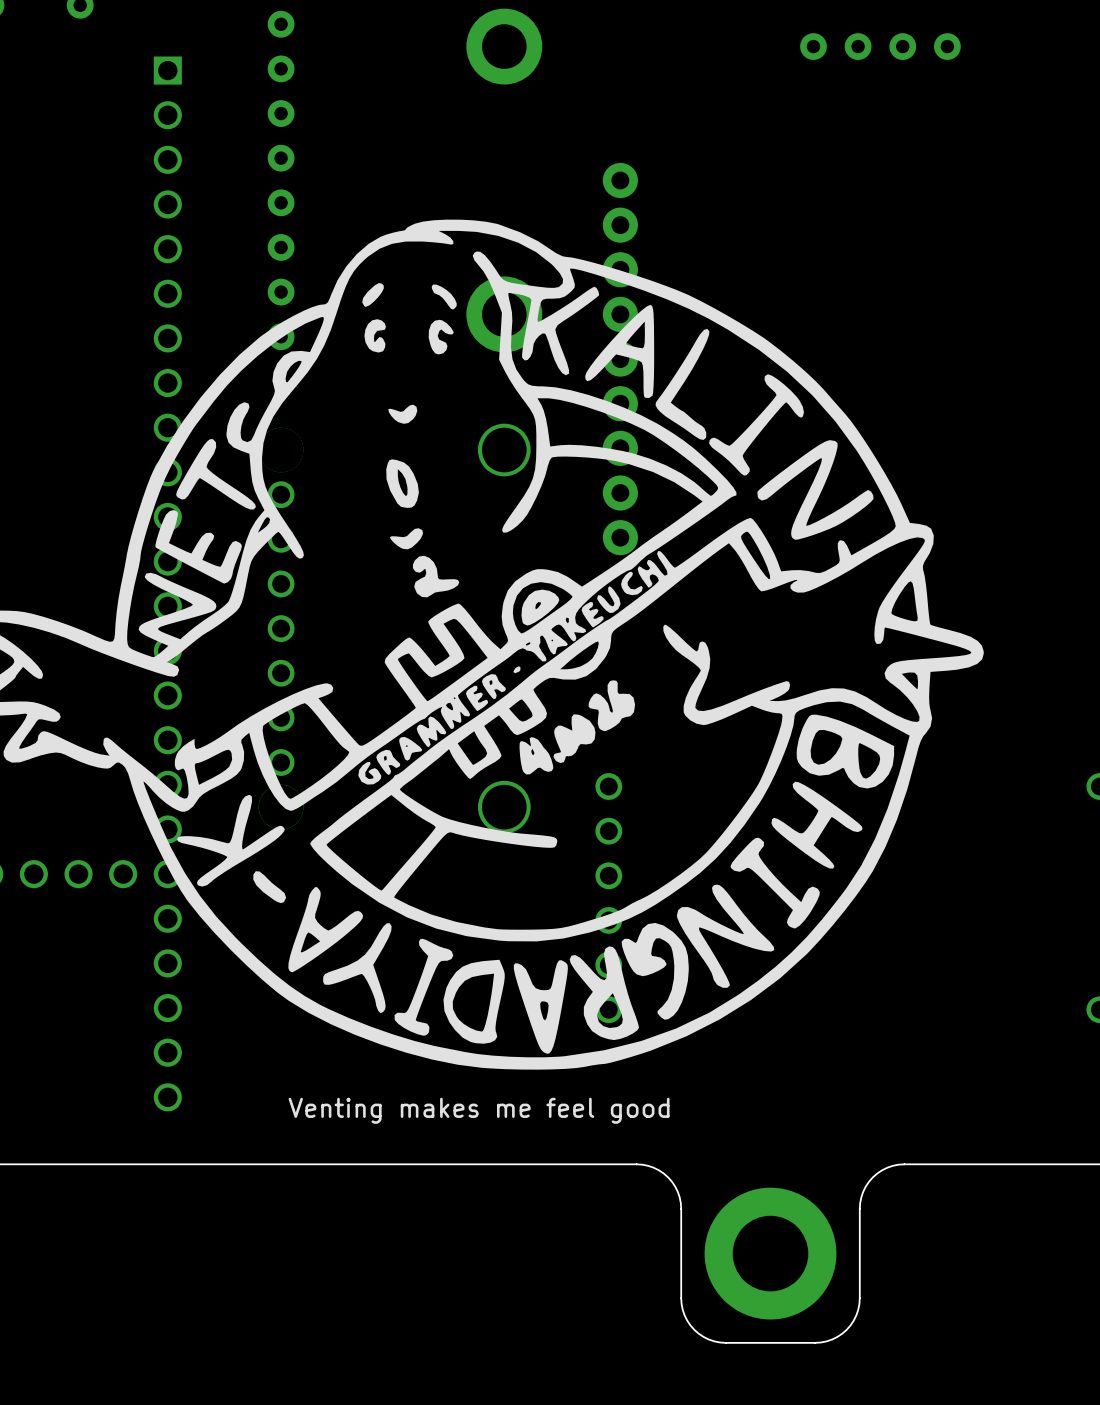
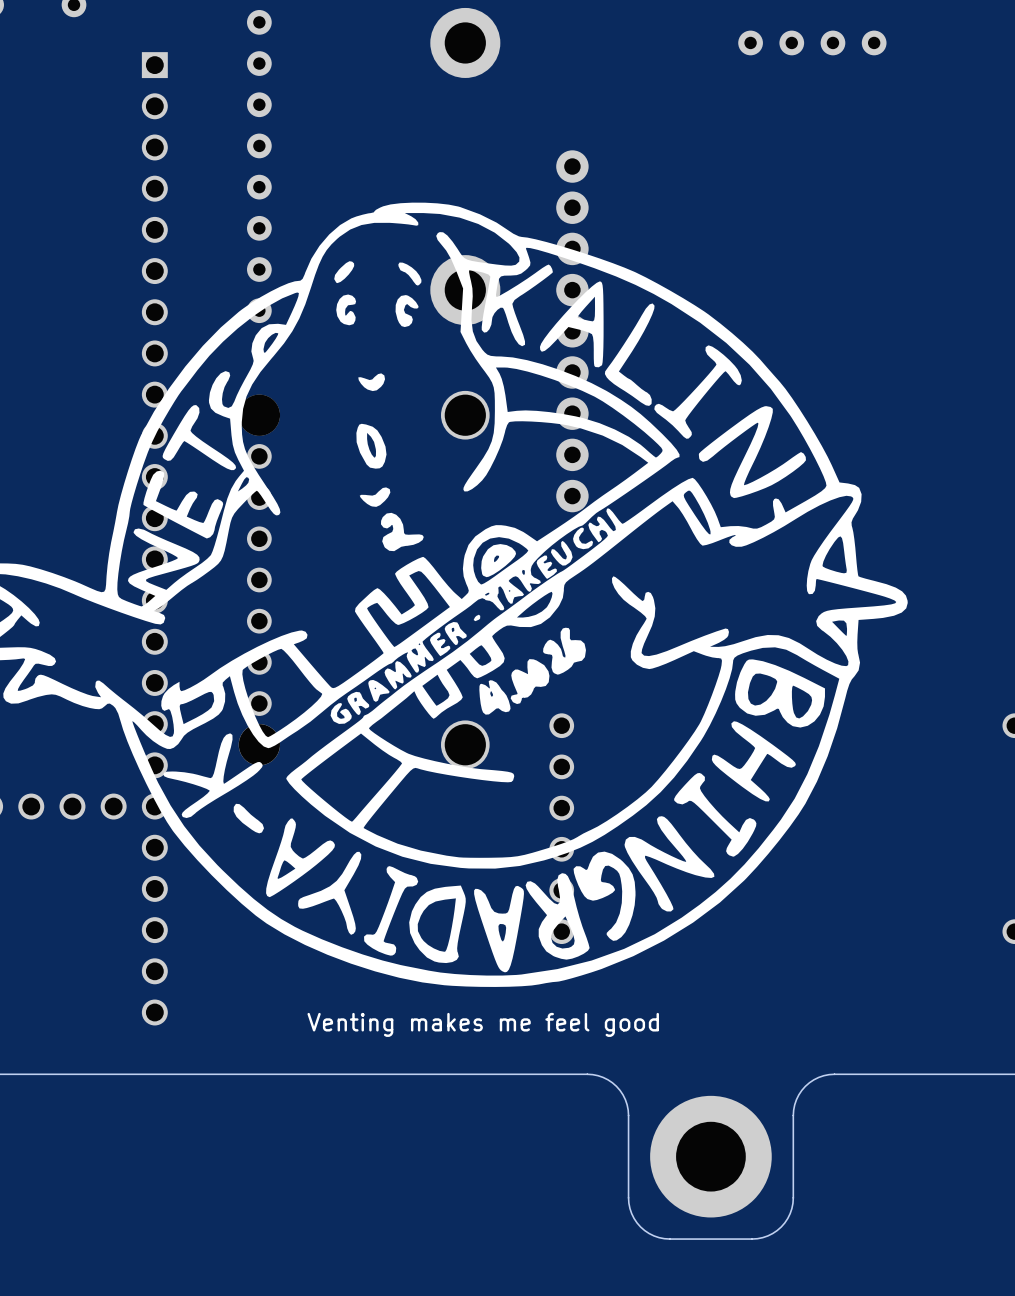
text position: Venting makes me feel good (479, 1110) -> Venting makes me feel good (483, 1024)

